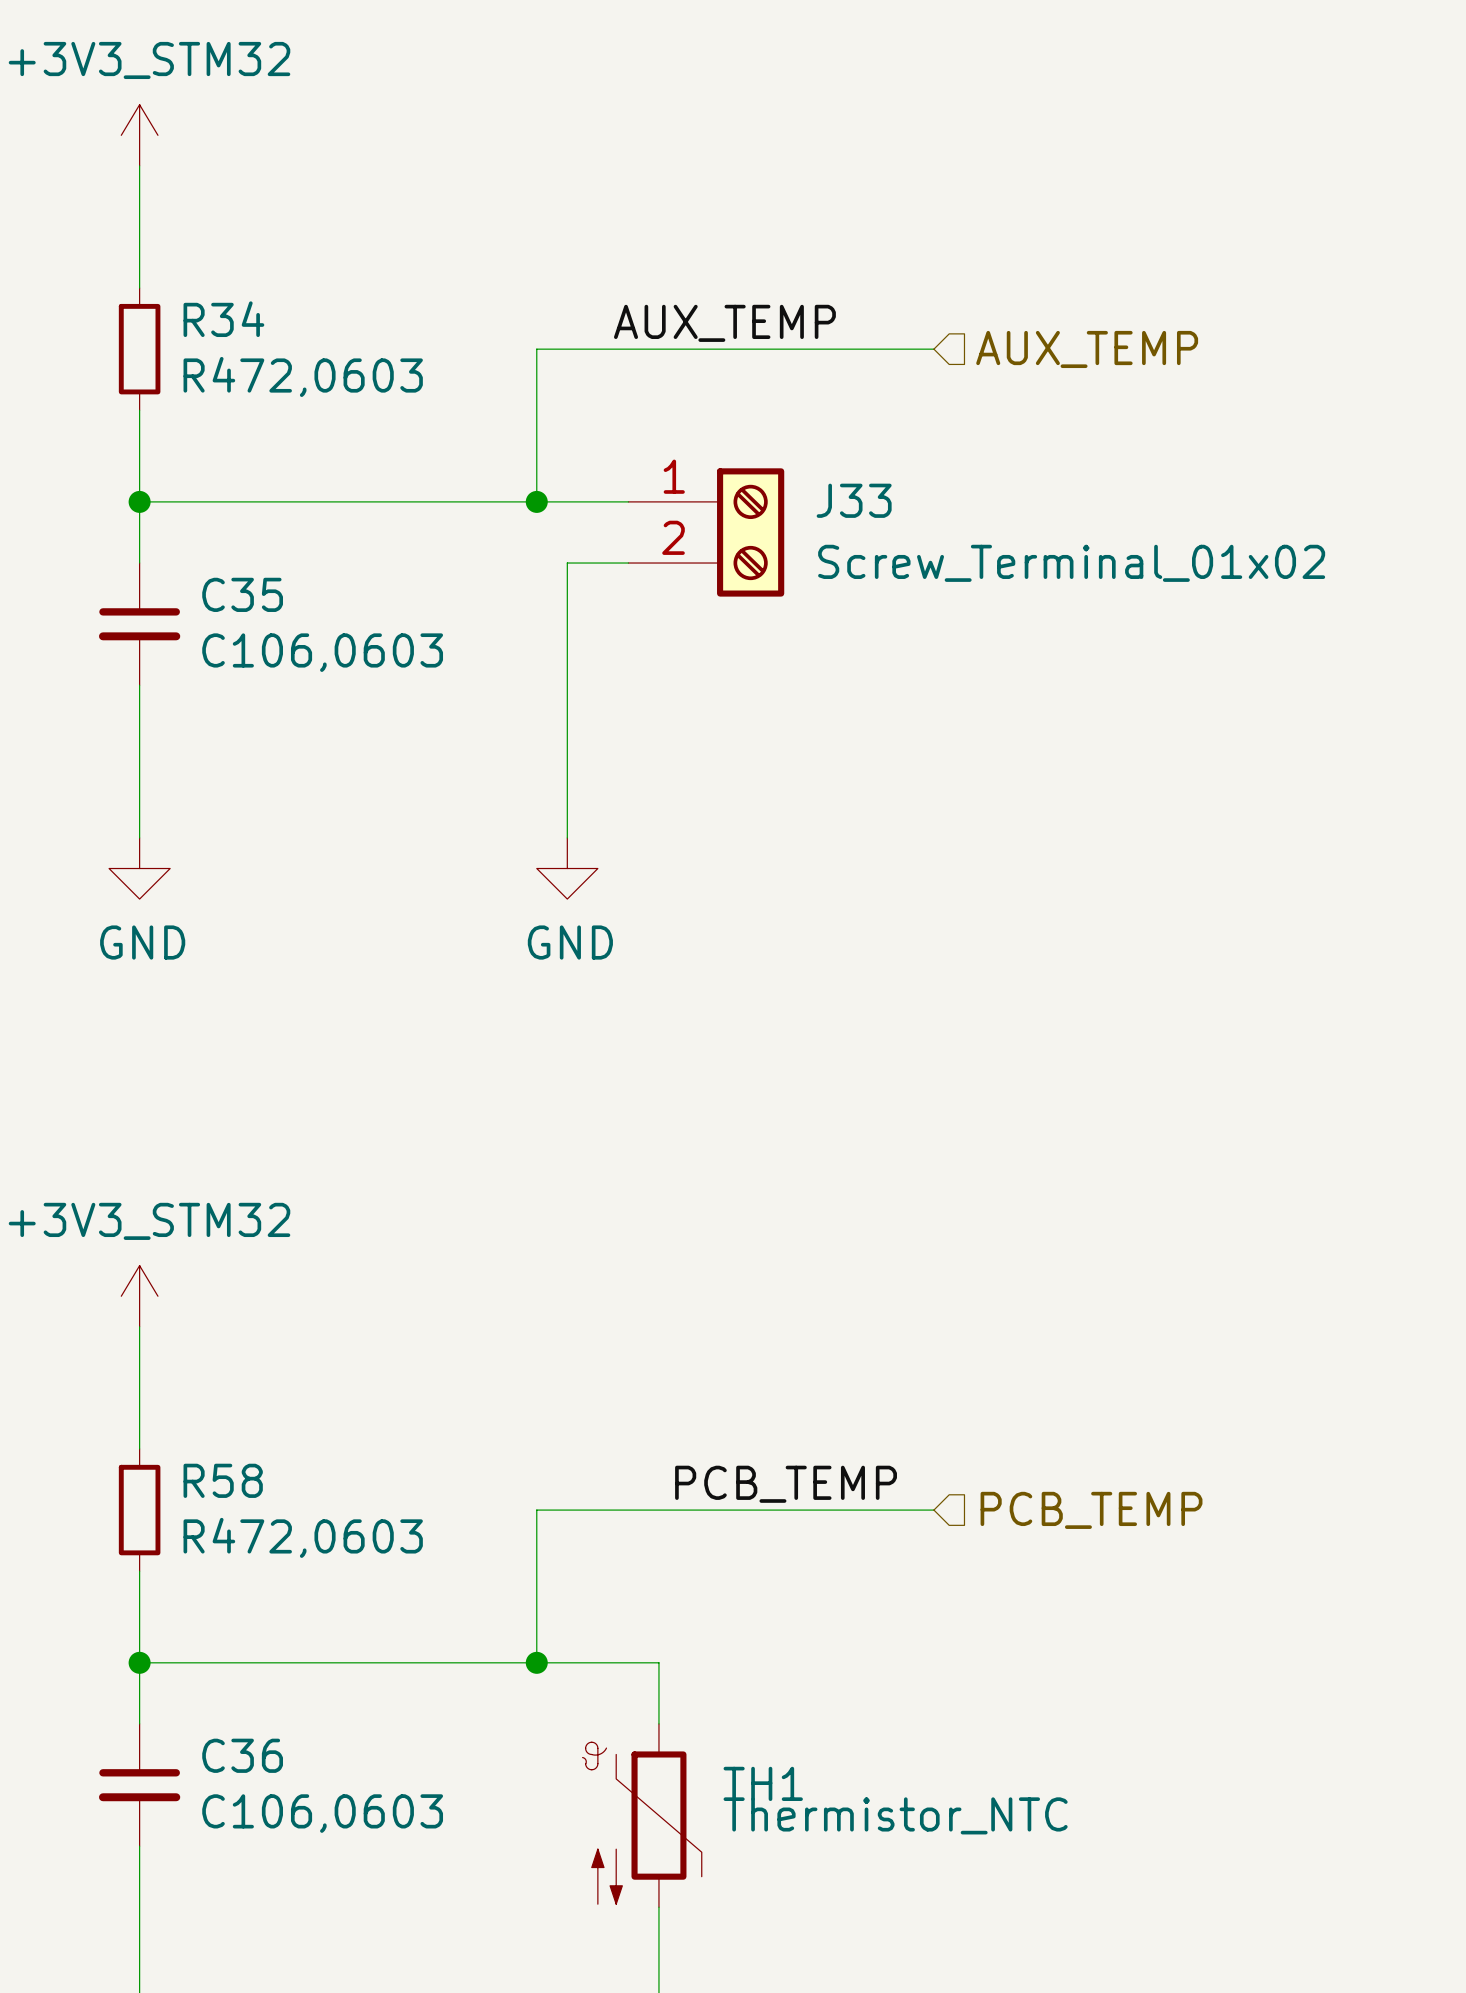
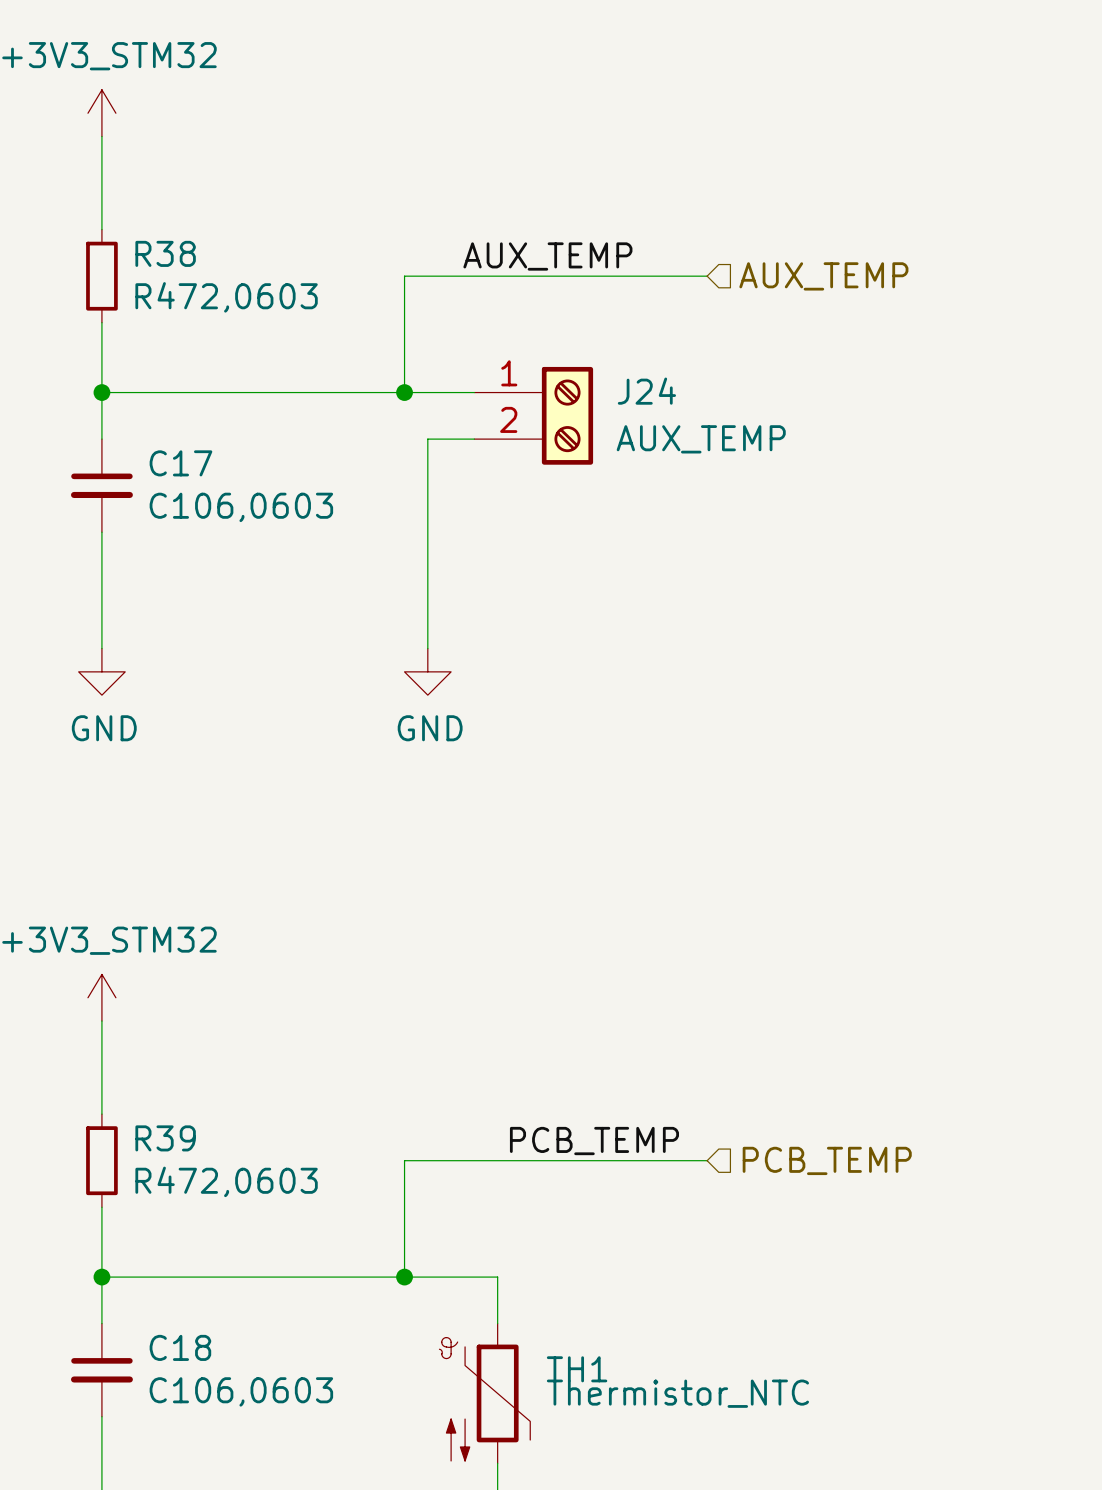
R34 name: R34 (223, 319) -> R38 (165, 253)
J33 name: J33 (854, 500) -> J24 (646, 391)
J33 value: Screw_Terminal_01x02 (1071, 563) -> AUX_TEMP (701, 439)
C35 name: C35 (242, 594) -> C17 (180, 463)
R58 name: R58 (223, 1480) -> R39 (165, 1138)
C36 name: C36 (242, 1755) -> C18 (180, 1347)

